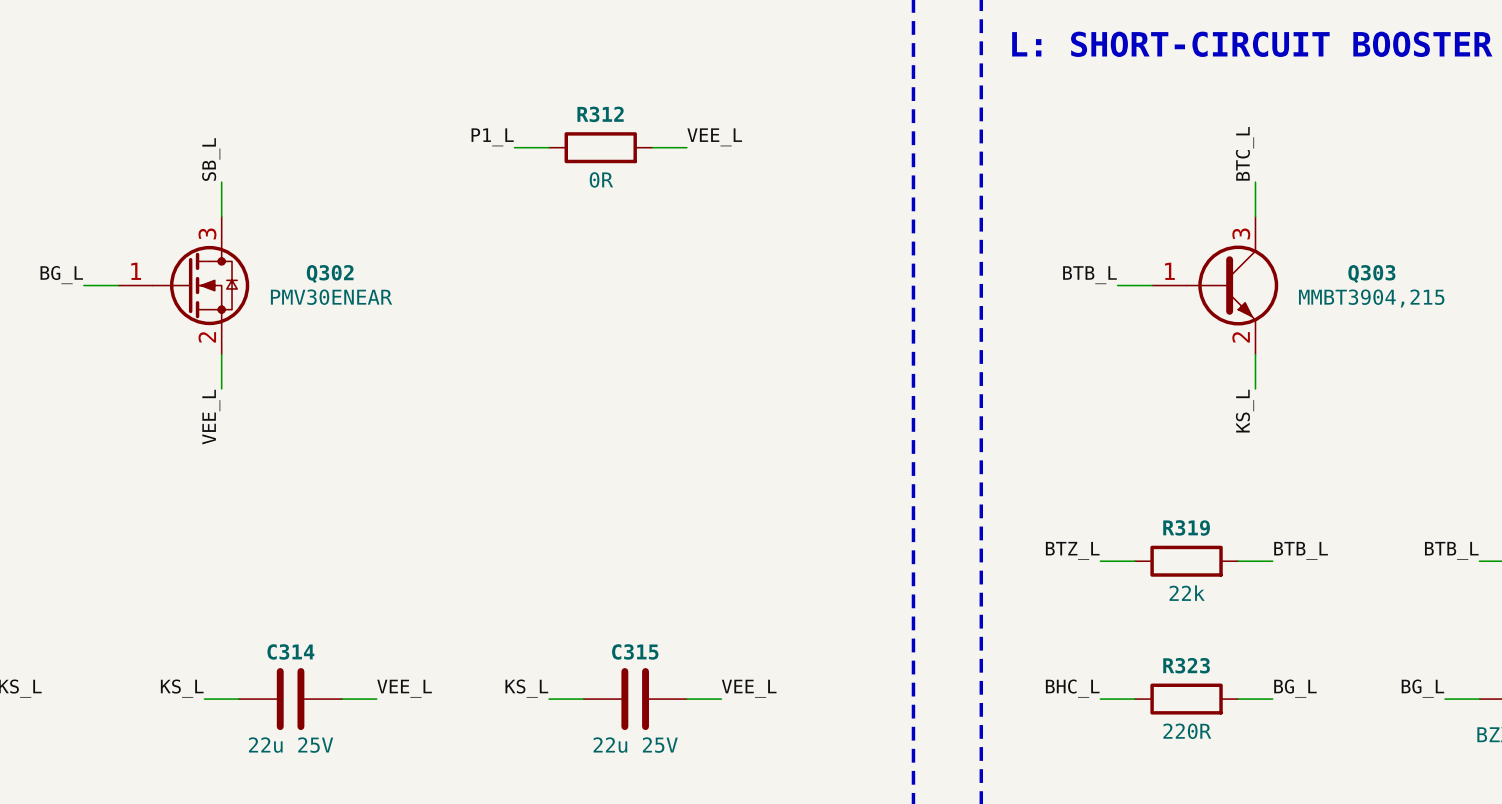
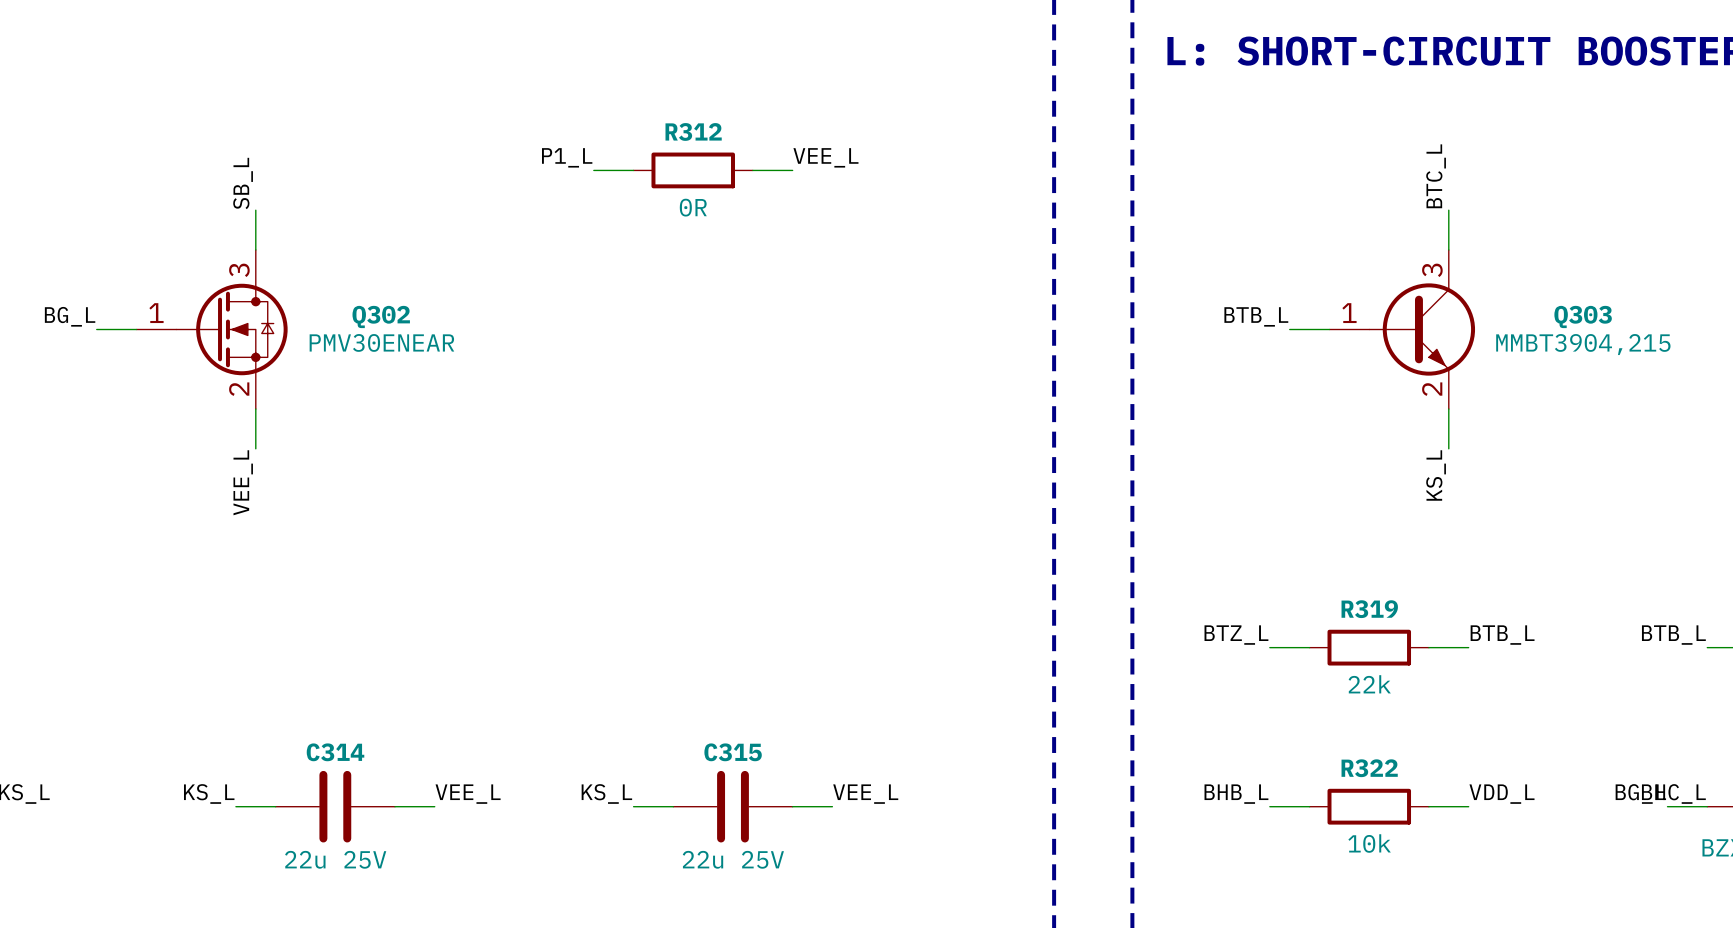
R323 name: R323 (1186, 665) -> R322 (1369, 768)
label: BHC_L (1072, 688) -> BHB_L (1236, 794)
label: BG_L (1295, 688) -> VDD_L (1502, 794)
label: none -> BHC_L (1673, 793)
R323 value: 220R (1187, 731) -> 10k (1369, 843)

